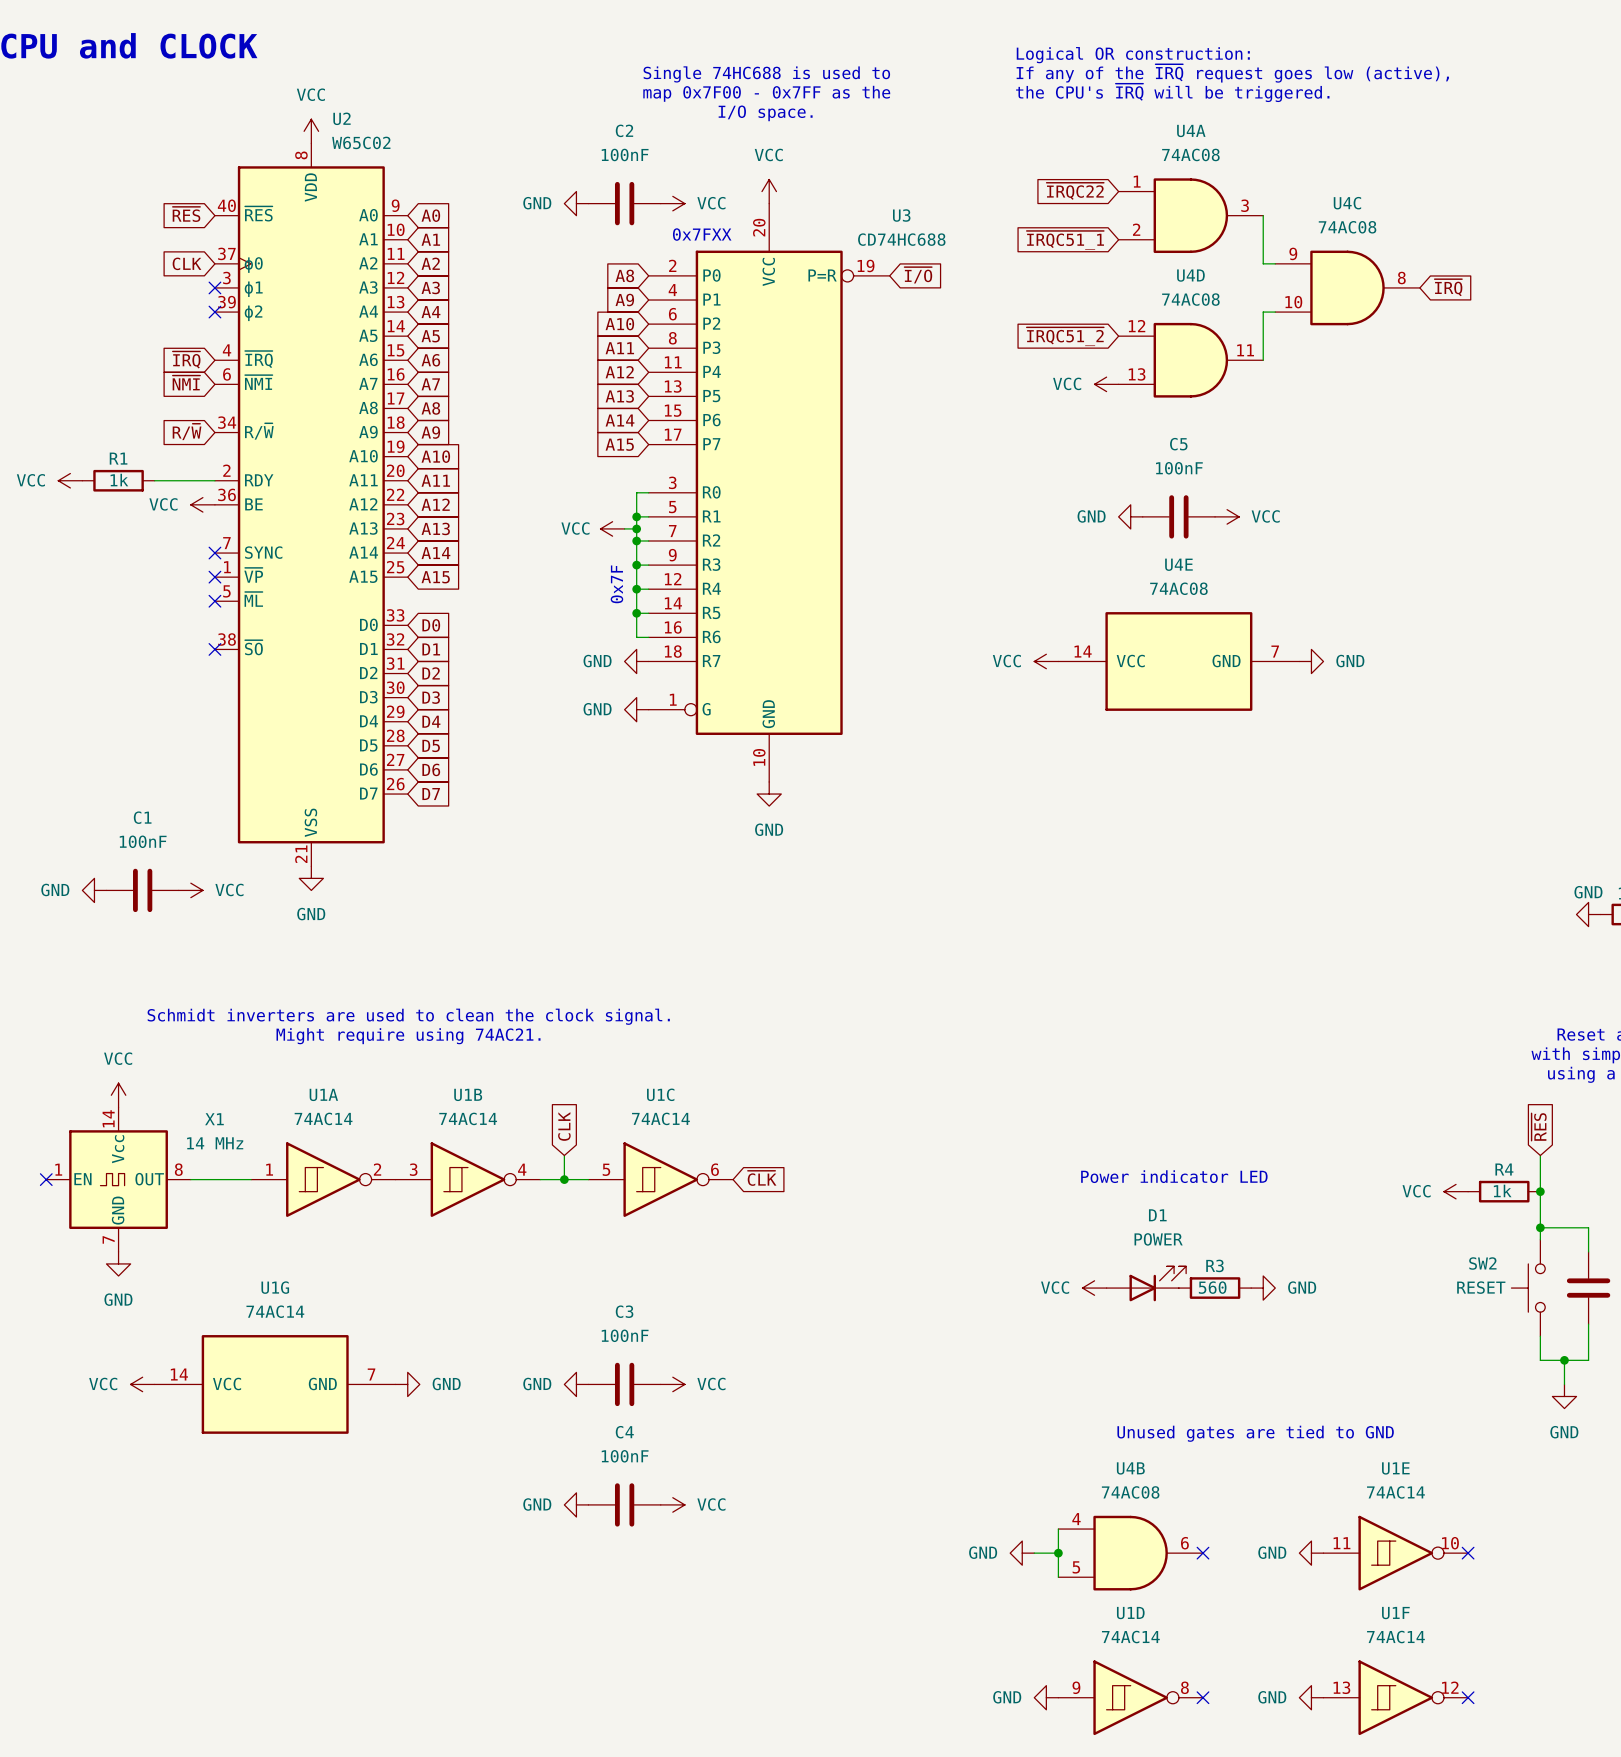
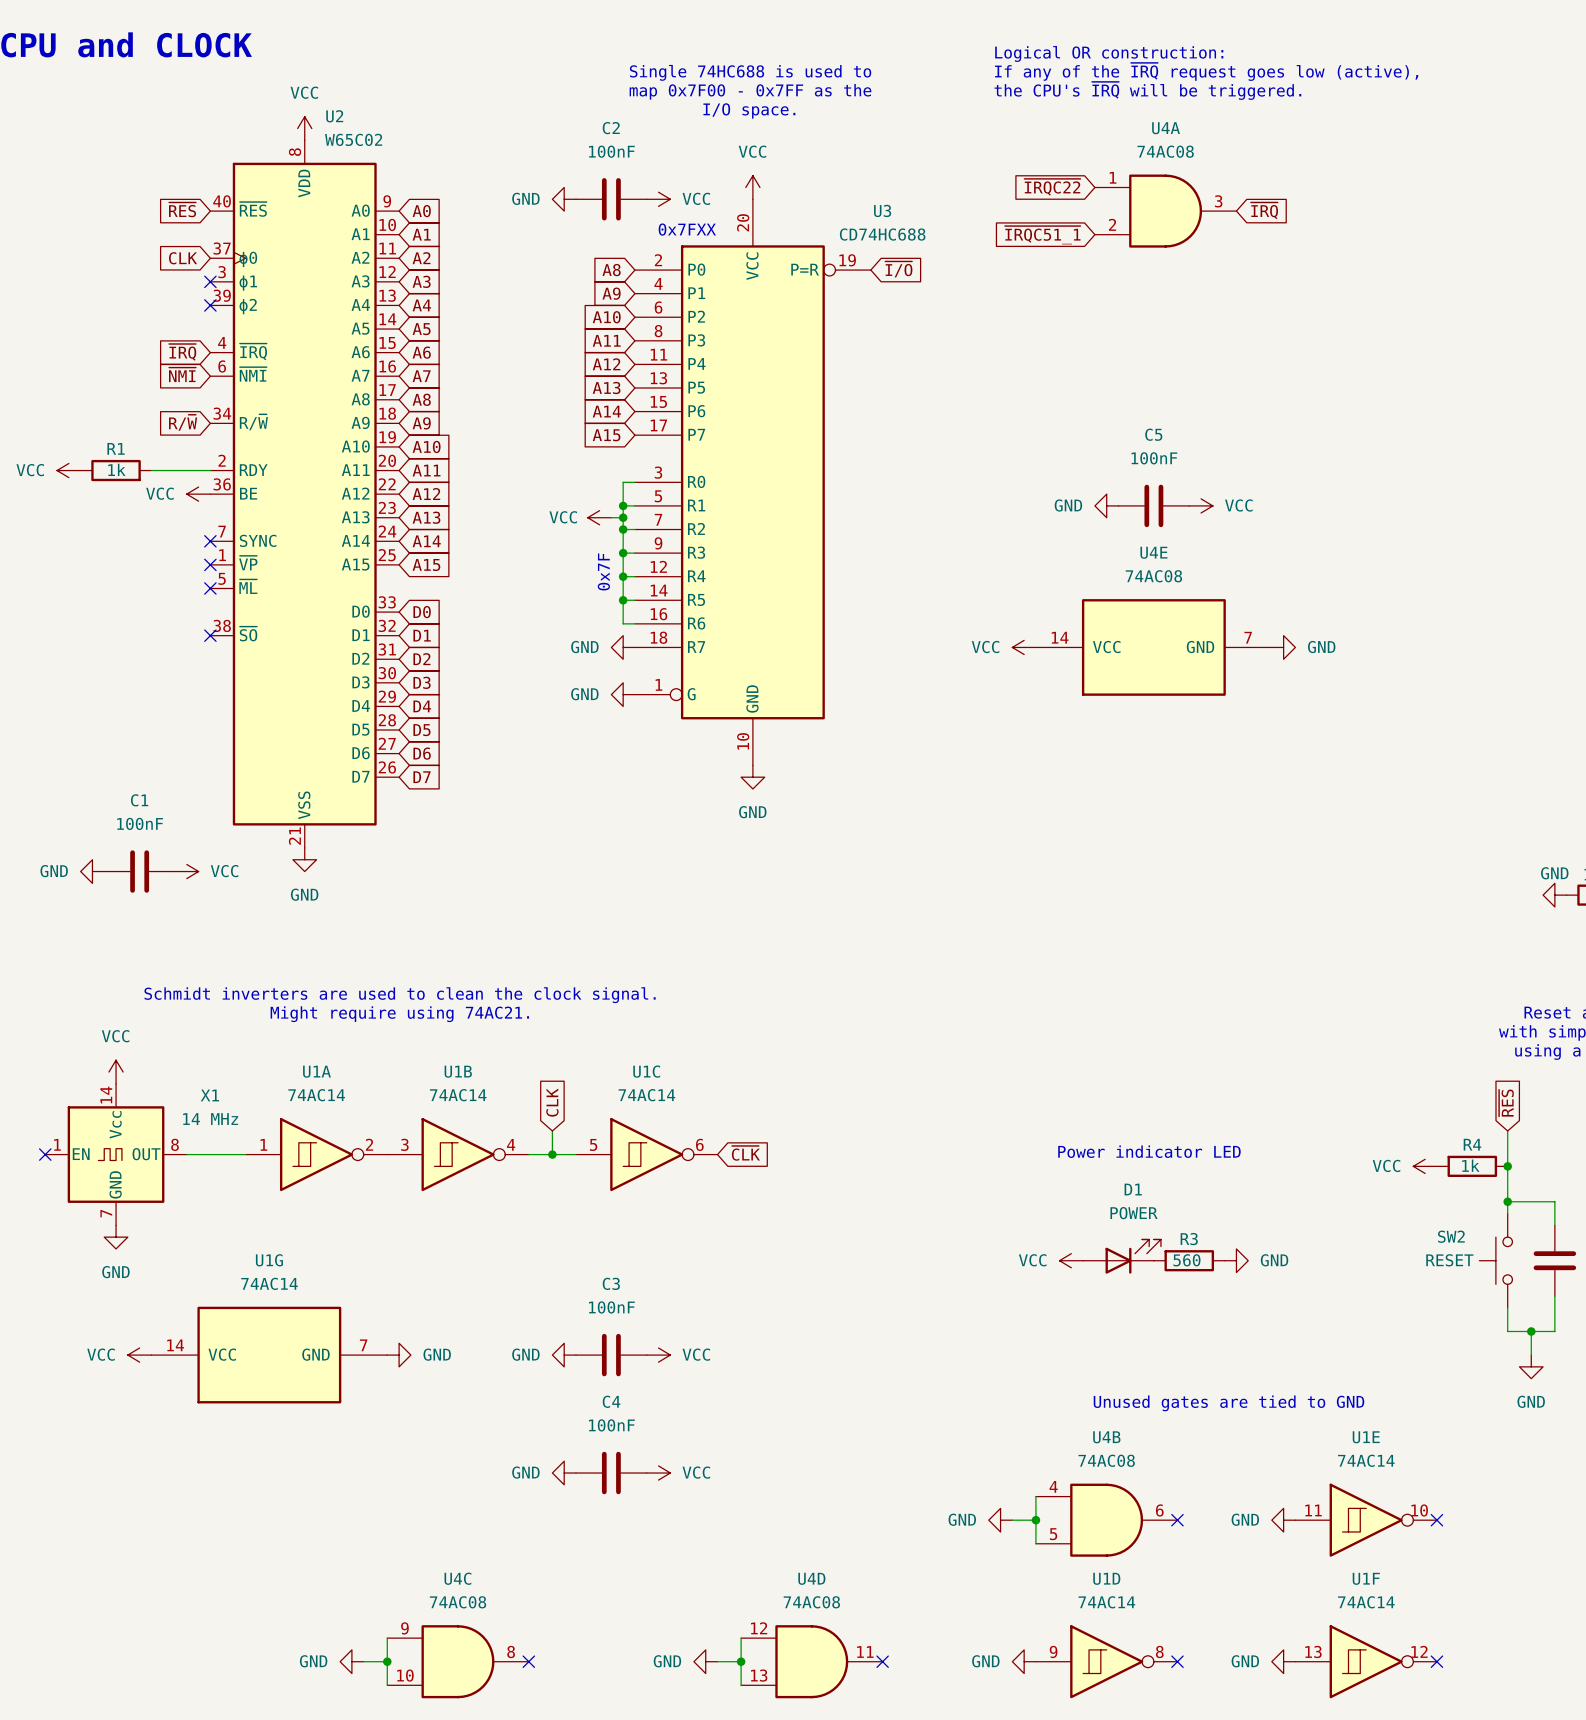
wire: (1263, 215) (1263, 263) (1275, 263) -> none
U4C position: (1347, 287) -> (458, 1661)
global label position: ~{IRQ} (1448, 287) -> ~{IRQ} (1264, 210)
wire: (1275, 312) (1263, 312) (1263, 360) -> none
global label: ~{IRQC51_2} (1065, 336) -> none
U4D position: (1190, 360) -> (811, 1661)
power symbol: VCC (1106, 384) -> none
wire: none -> (387, 1638) (387, 1685)
wire: none -> (741, 1638) (741, 1685)
power symbol: none -> GND (351, 1661)
wire: none -> (363, 1661) (387, 1661)
junction: none -> (387, 1661)
no-connect mark: none -> (528, 1661)
power symbol: none -> GND (705, 1661)
wire: none -> (717, 1661) (741, 1661)
junction: none -> (741, 1661)
no-connect mark: none -> (882, 1661)

